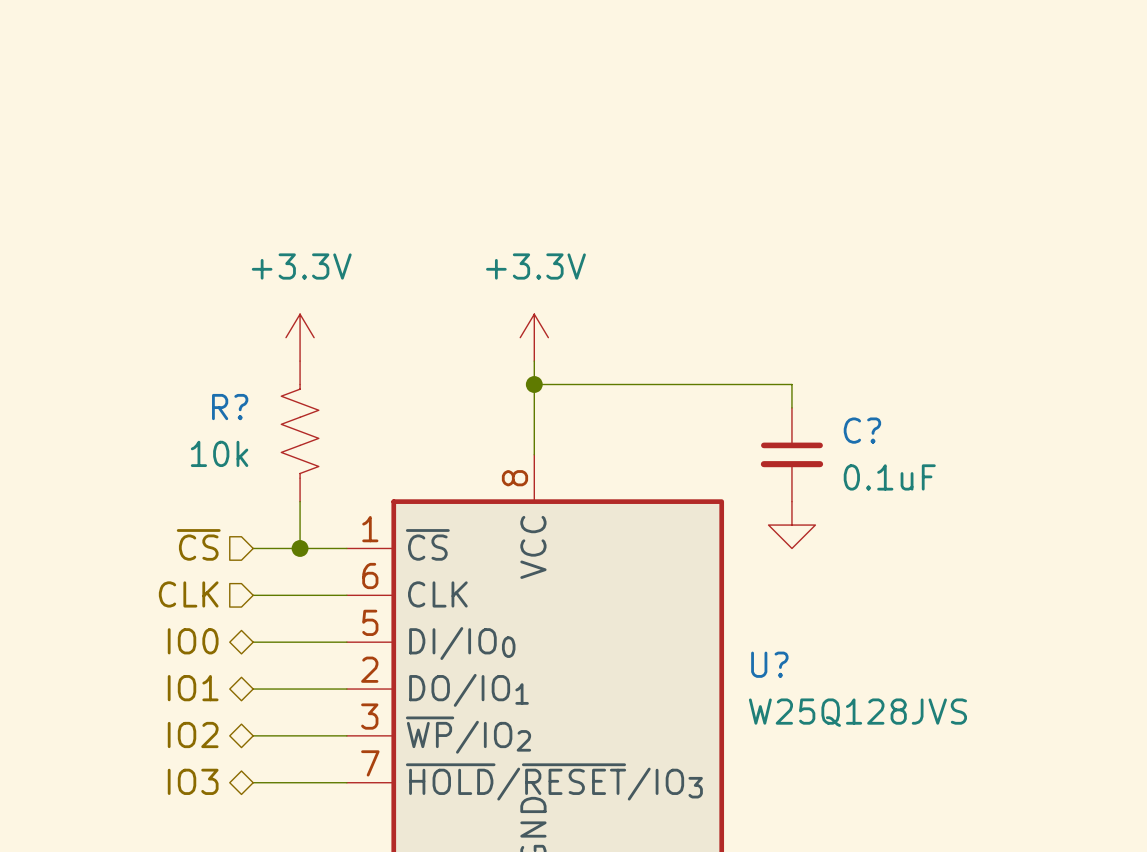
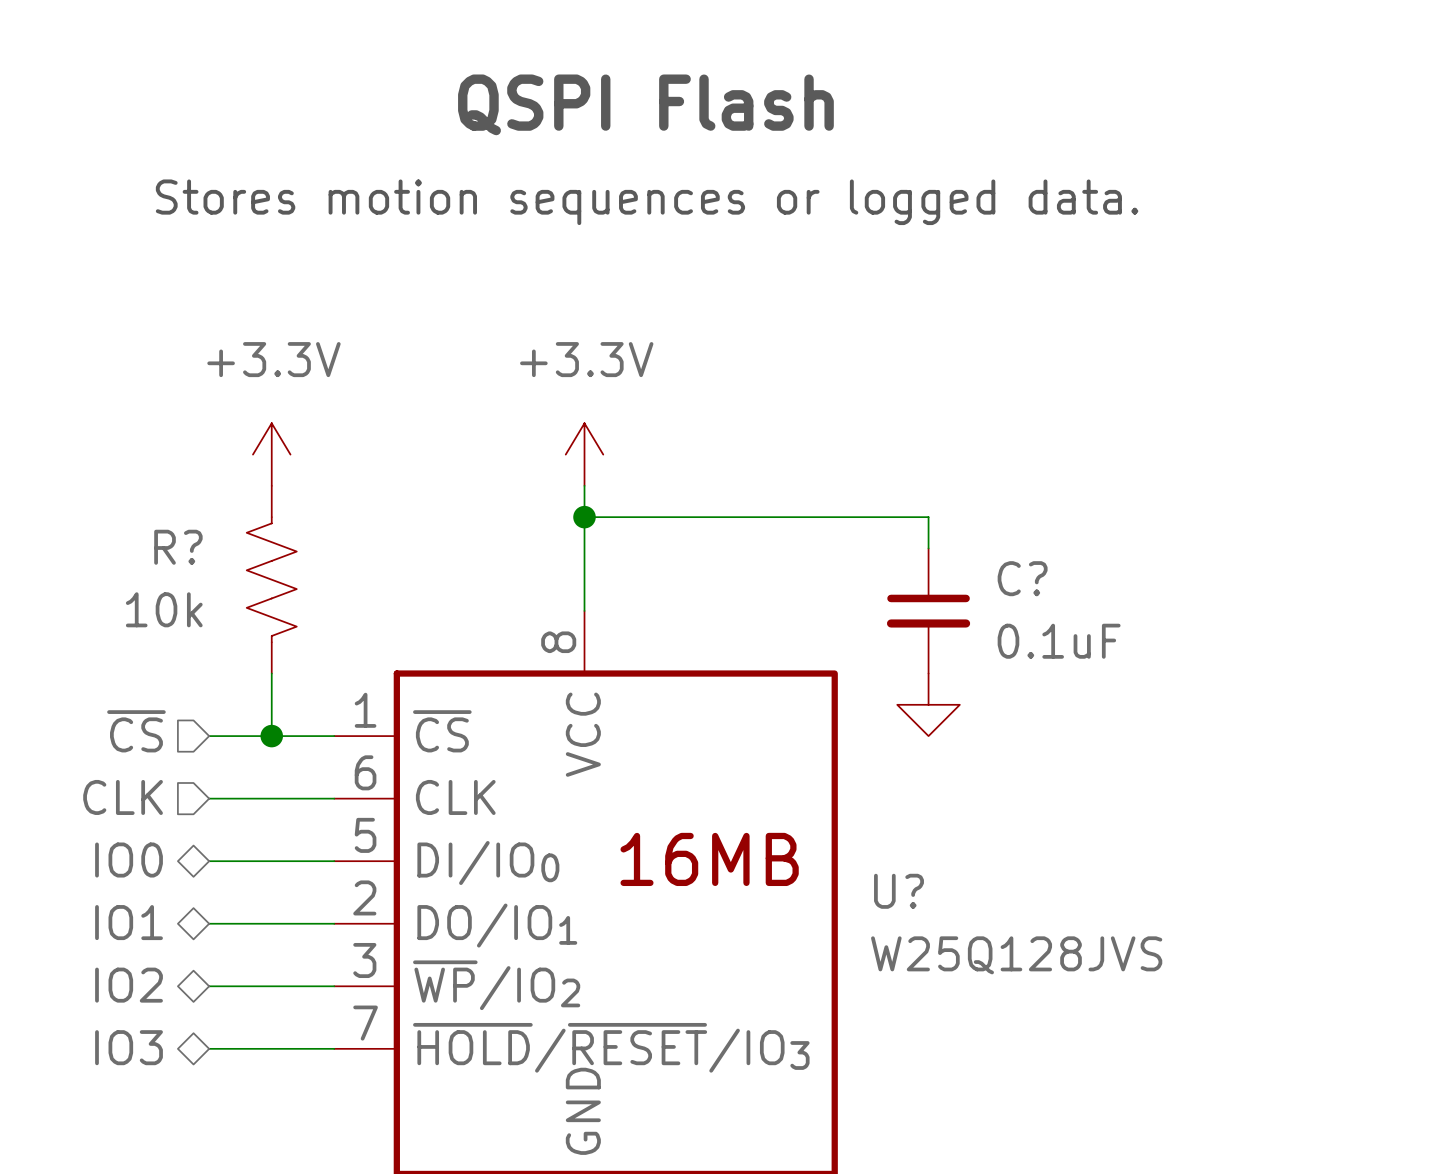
text: none -> QSPI Flash (645, 104)
text: none -> Stores motion sequences or logged data. (647, 202)
U? text: none -> 16MB (709, 859)

